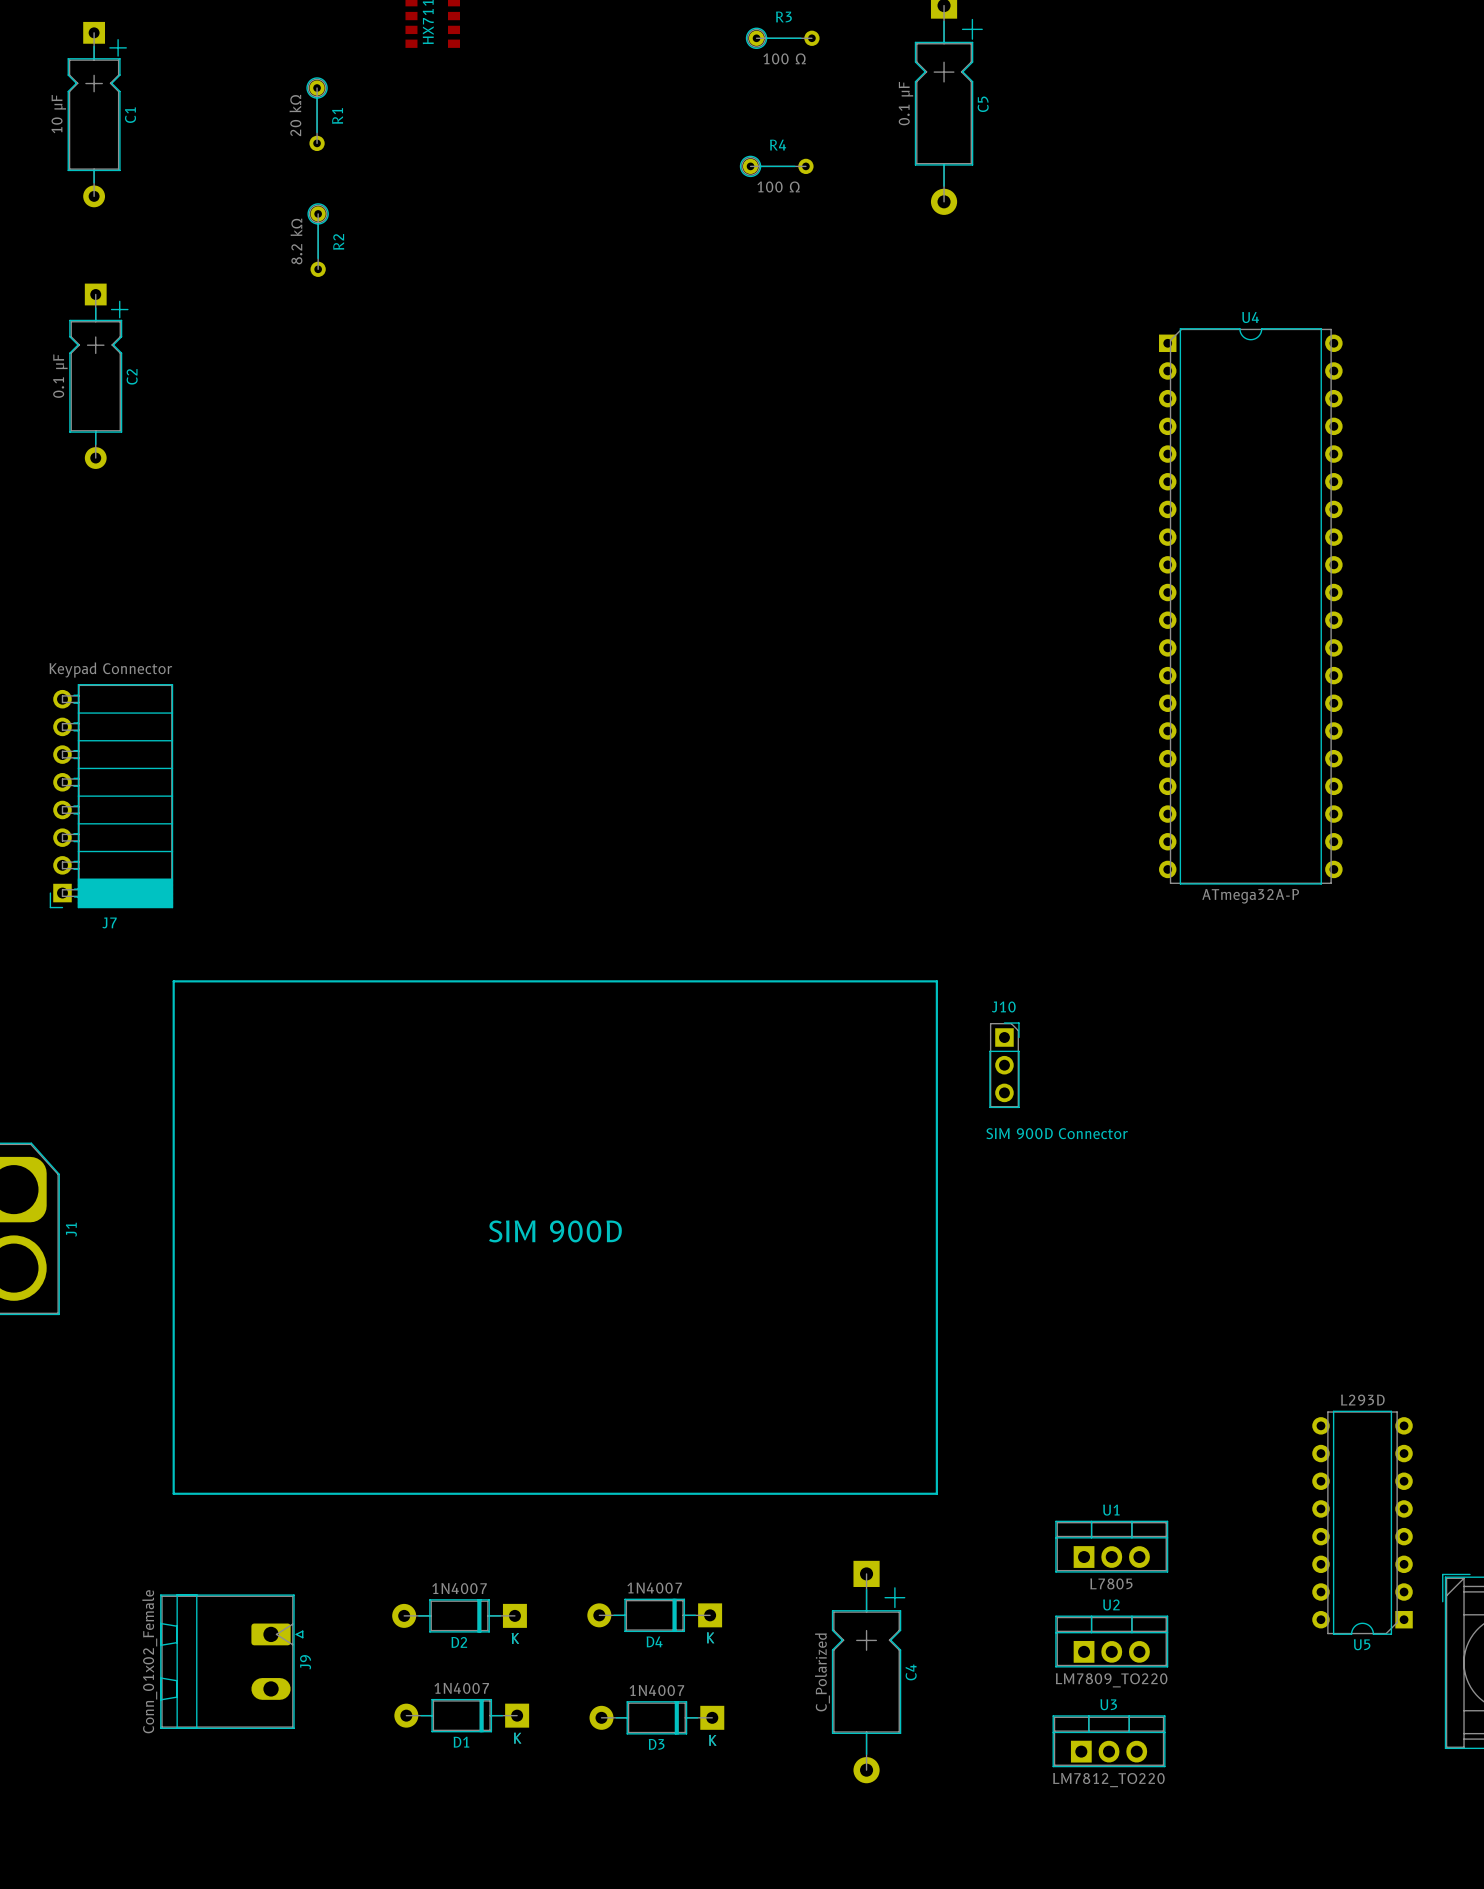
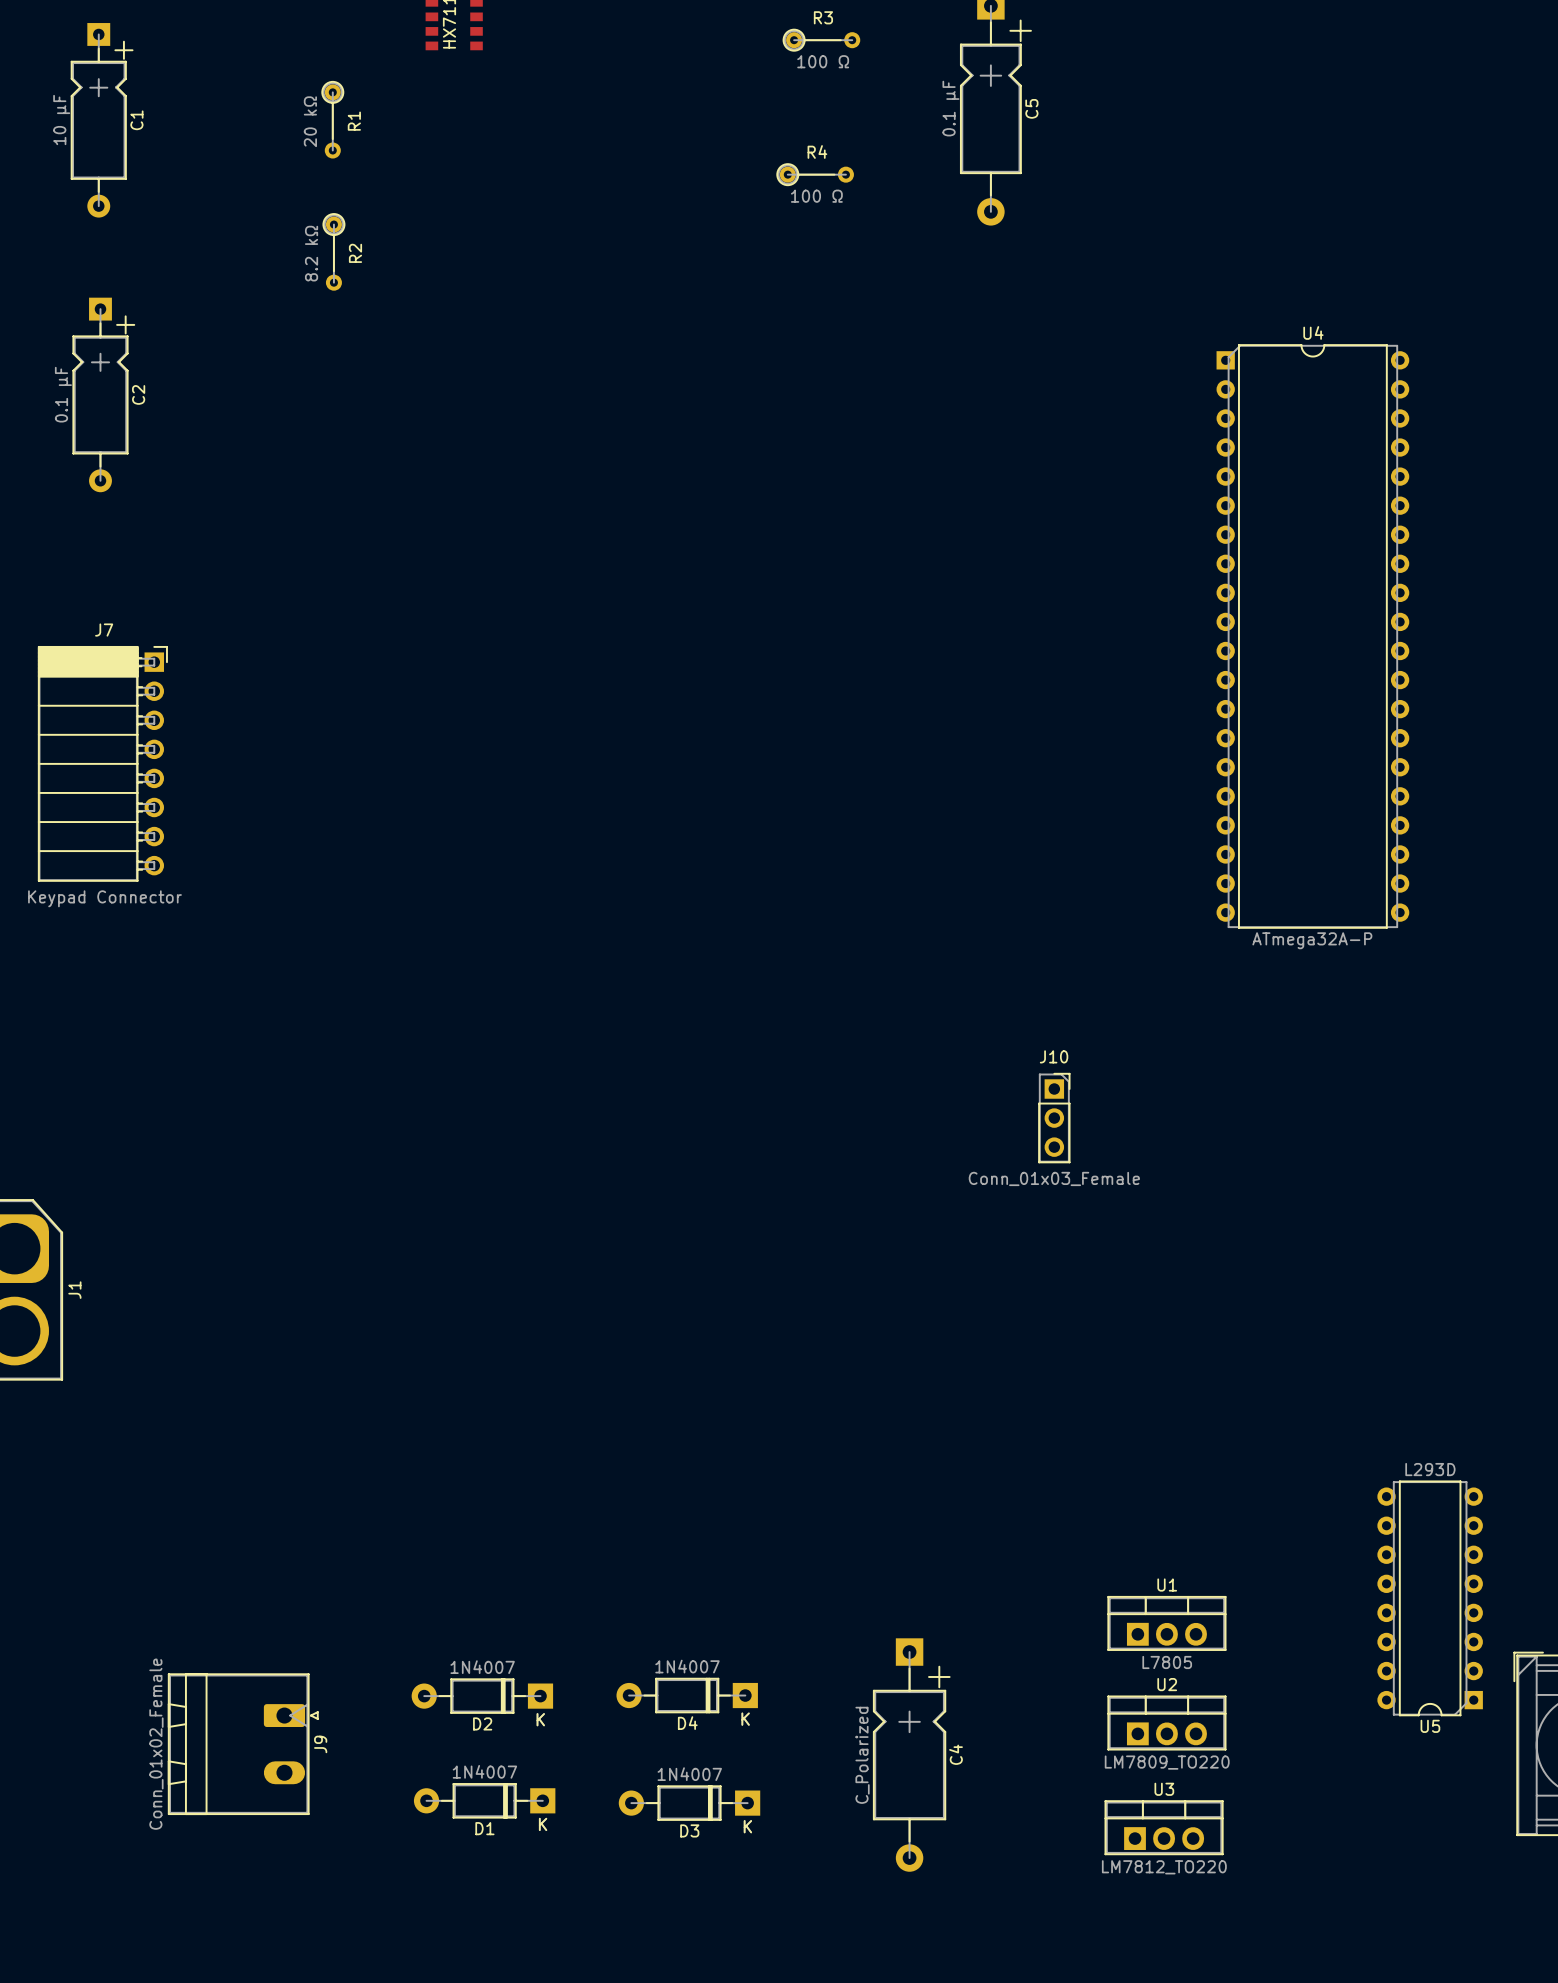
J7 rotation: 0° (111, 796) -> 180° (102, 763)
line: (173, 981) (936, 981) (936, 1493) (173, 1493) (173, 981) -> none
J10 value: SIM 900D Connector (1057, 1133) -> Conn_01x03_Female (1054, 1178)
text: SIM 900D (555, 1231) -> none

